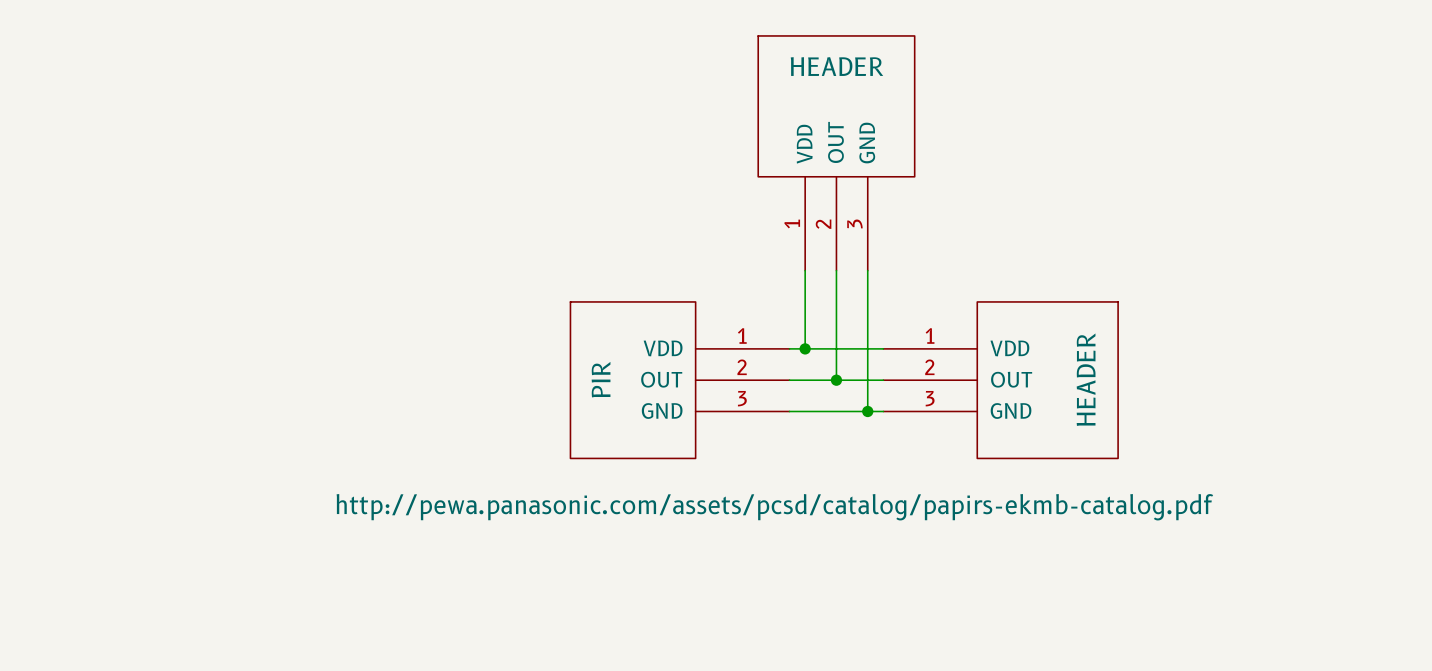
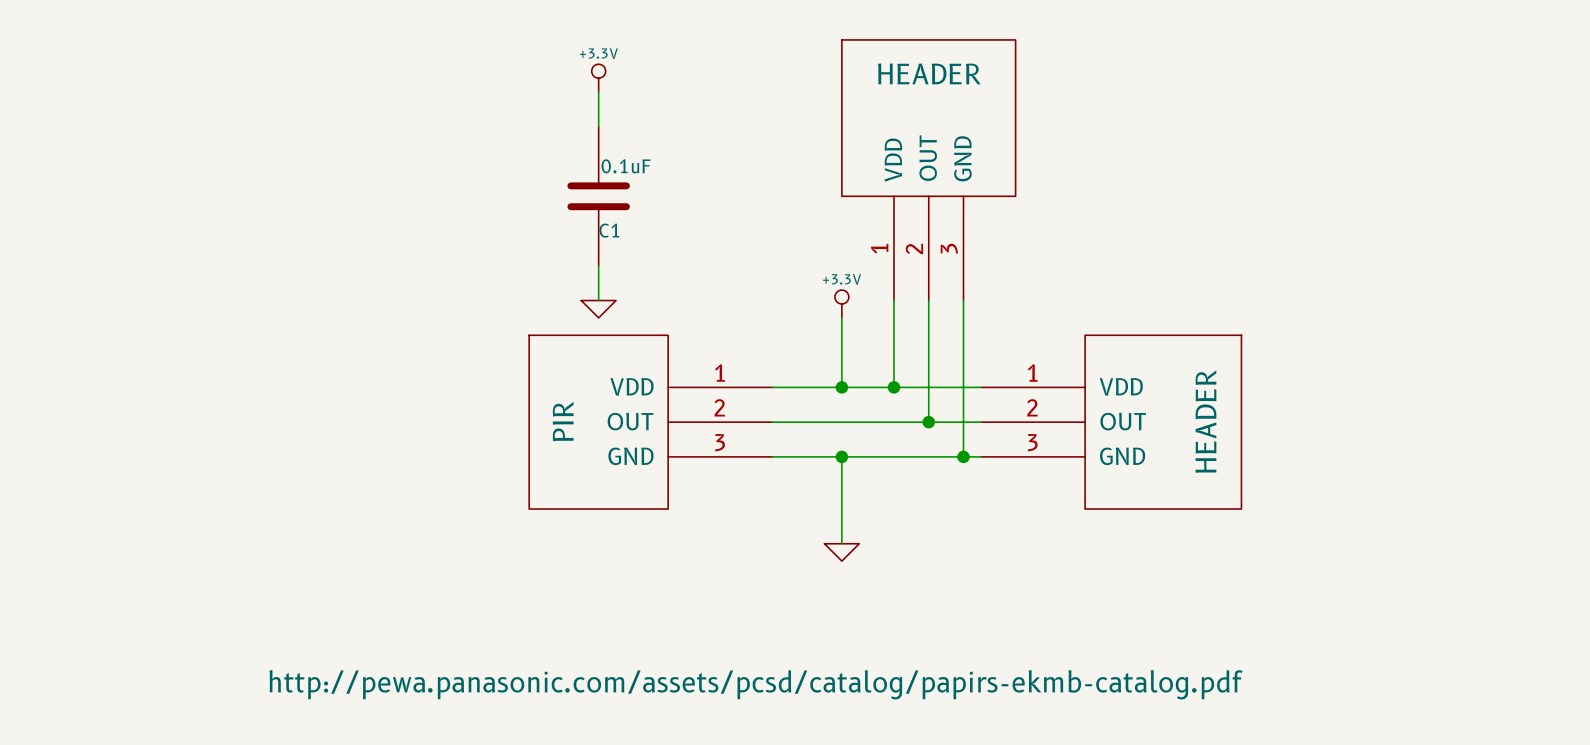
power symbol: none -> +3.3V (598, 78)
wire: none -> (598, 92) (598, 126)
C1: none -> 0.1uF (598, 196)
wire: none -> (598, 265) (598, 300)
power symbol: none -> +3.3V (841, 304)
power symbol: none -> (598, 309)
wire: none -> (841, 317) (841, 387)
junction: none -> (841, 387)
part position: (679, 380) -> (650, 422)
wire: none -> (841, 456) (841, 543)
junction: none -> (841, 456)
power symbol: none -> (841, 552)
part text position: http://pewa.panasonic.com/assets/pcsd/catalog/papirs-ekmb-catalog.pdf (774, 507) -> http://pewa.panasonic.com/assets/pcsd/catalog/papirs-ekmb-catalog.pdf (756, 684)

